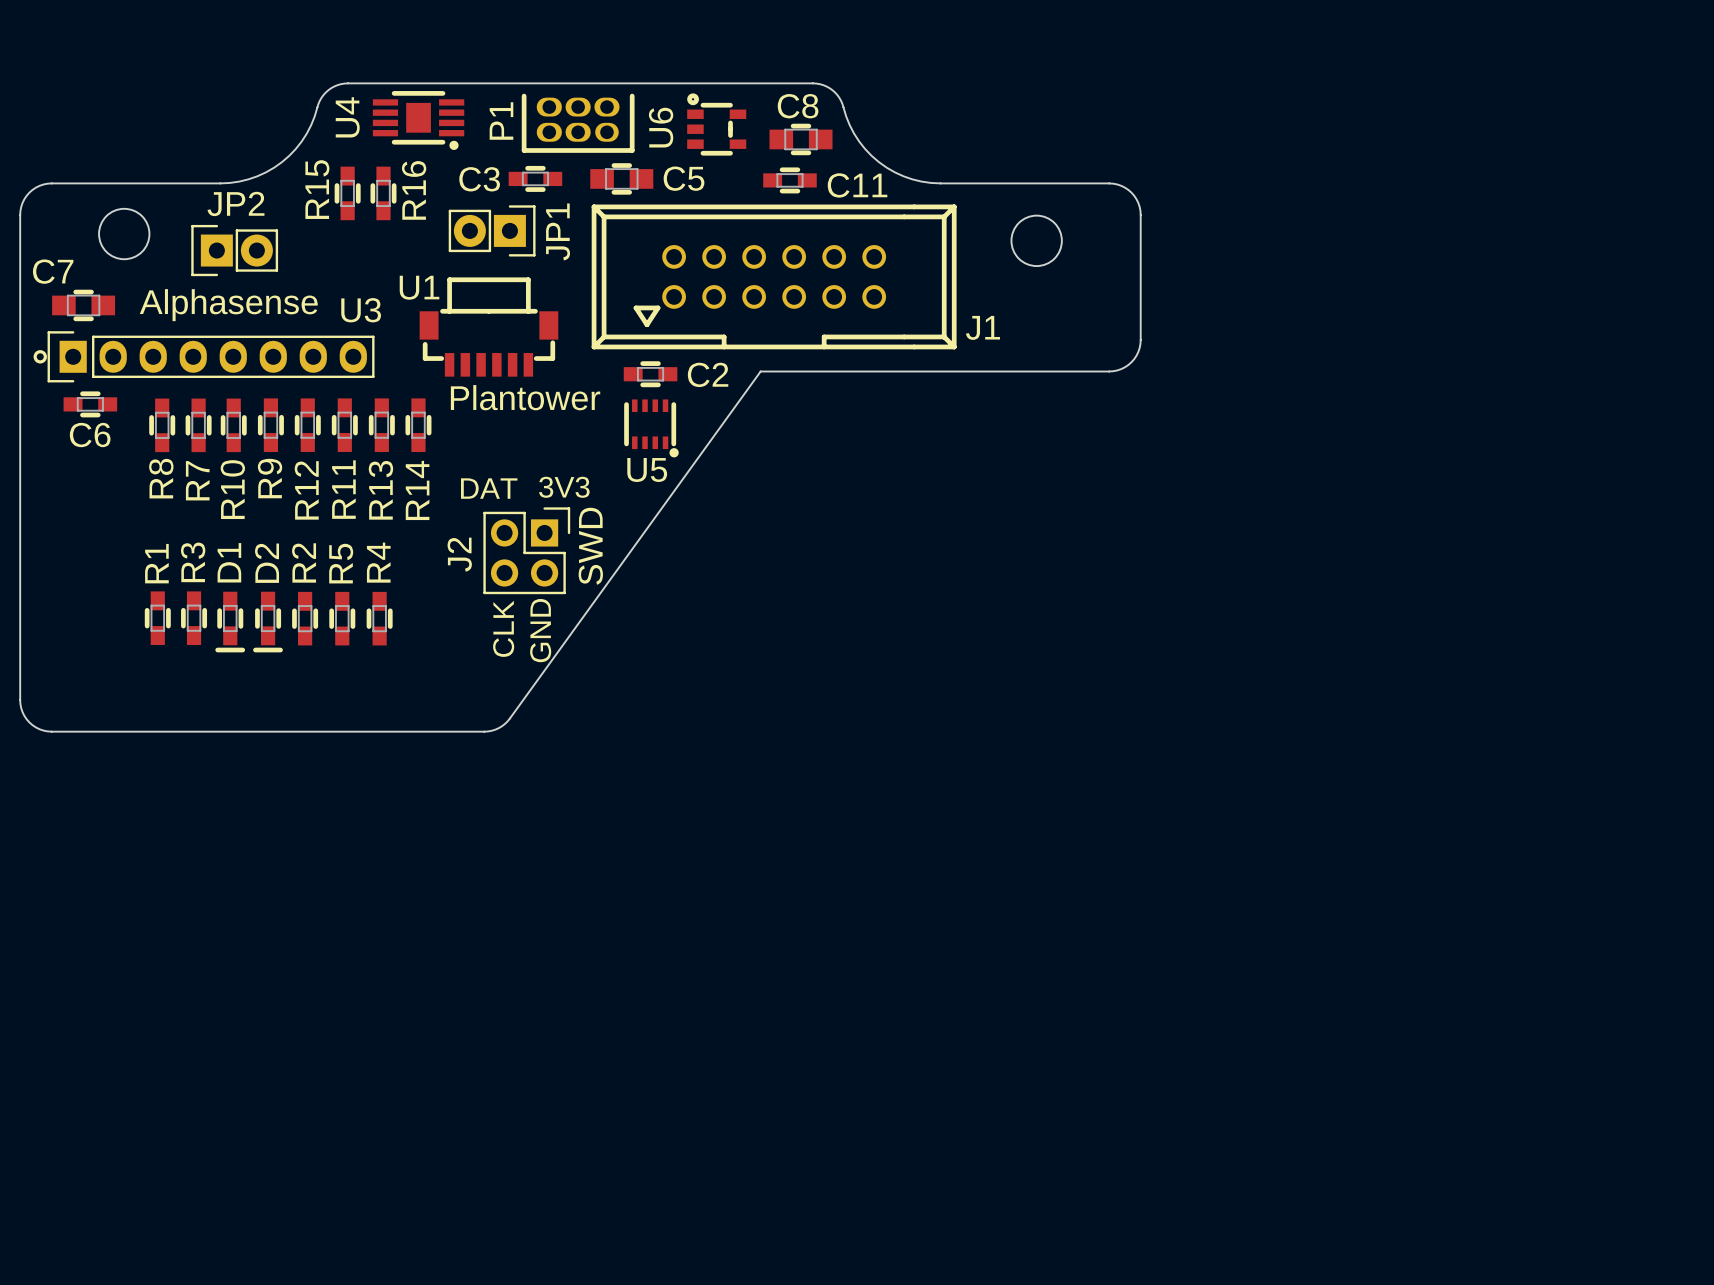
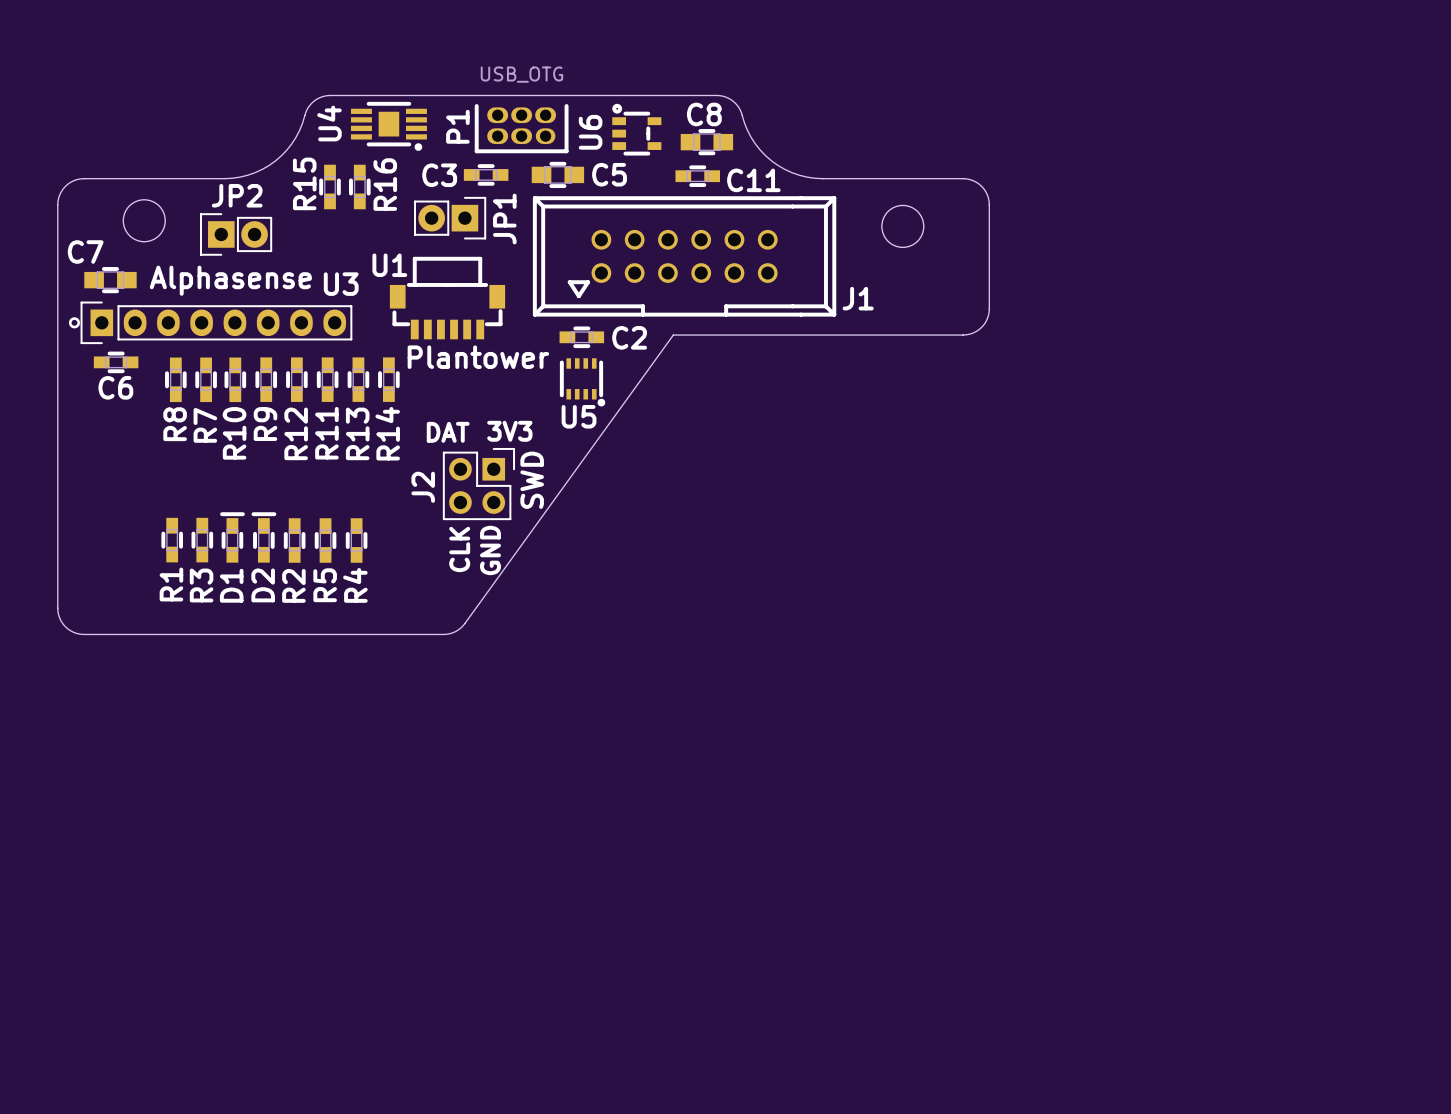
P1 value: none -> USB_OTG (521, 74)
R3 name position: R3 (193, 562) -> R3 (201, 585)
R2 name position: R2 (304, 562) -> R2 (293, 585)
R4 name position: R4 (378, 562) -> R4 (355, 585)
R1 name position: R1 (156, 563) -> R1 (171, 584)
R5 name position: R5 (341, 563) -> R5 (325, 585)
D1 rotation: 0° (230, 622) -> 180° (232, 537)
D2 rotation: 0° (268, 622) -> 180° (263, 537)

